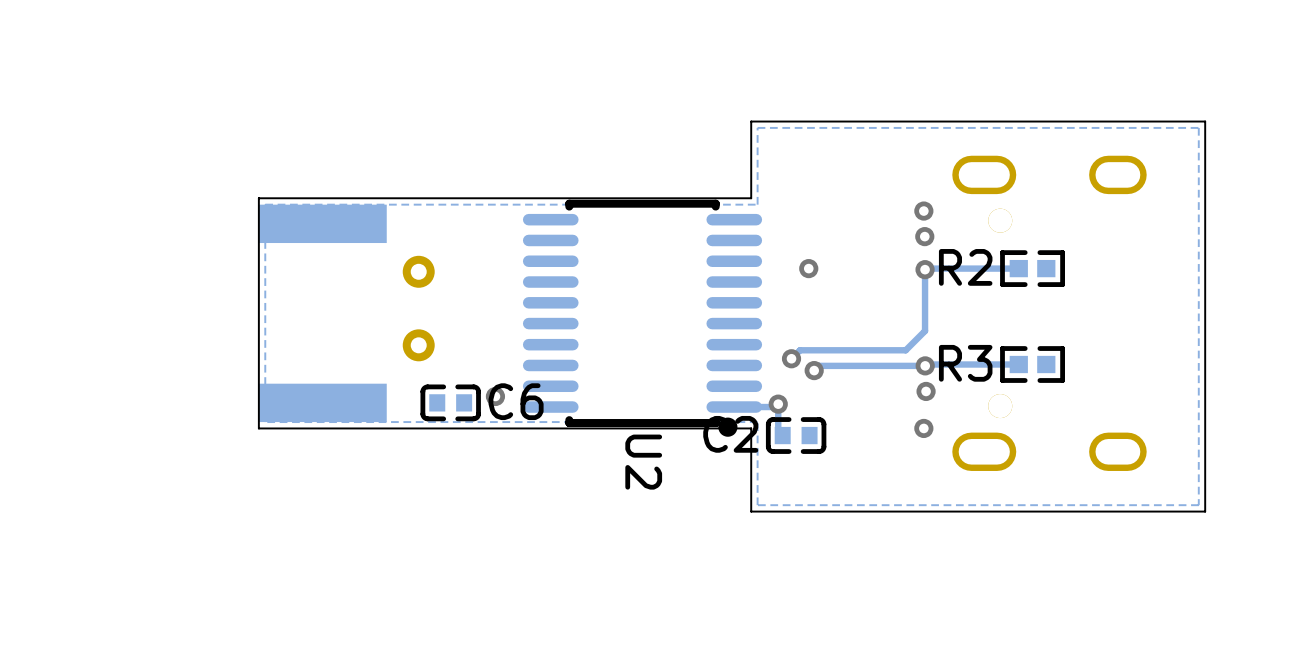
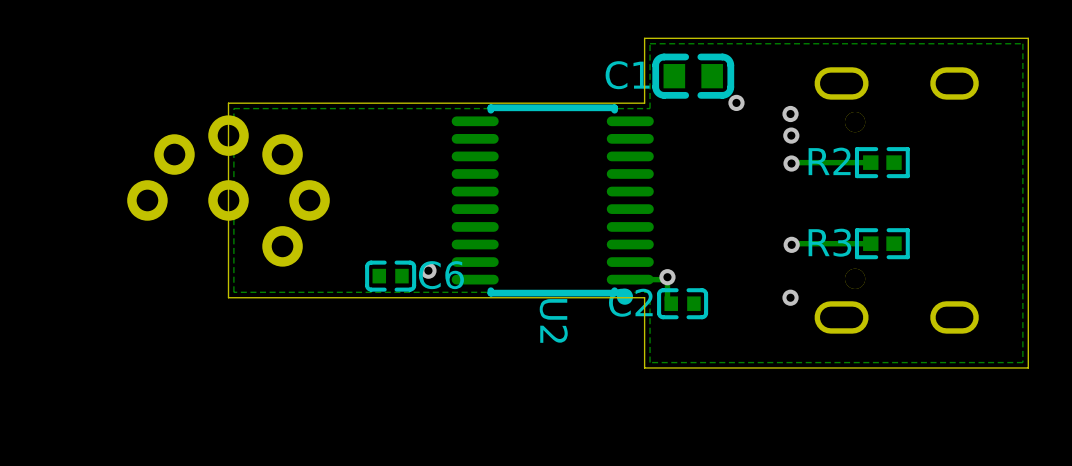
C1: none -> (693, 76)
via: none -> (736, 102)
via: (808, 268) -> none
track: (925, 269) (925, 330) (905, 350) (799, 350) (791, 358) -> none
part: none -> (228, 191)
part: (346, 313) -> none
via: (791, 358) -> none
track: (925, 365) (818, 365) (814, 370) -> none
via: (814, 370) -> none
via: (926, 391) -> none

